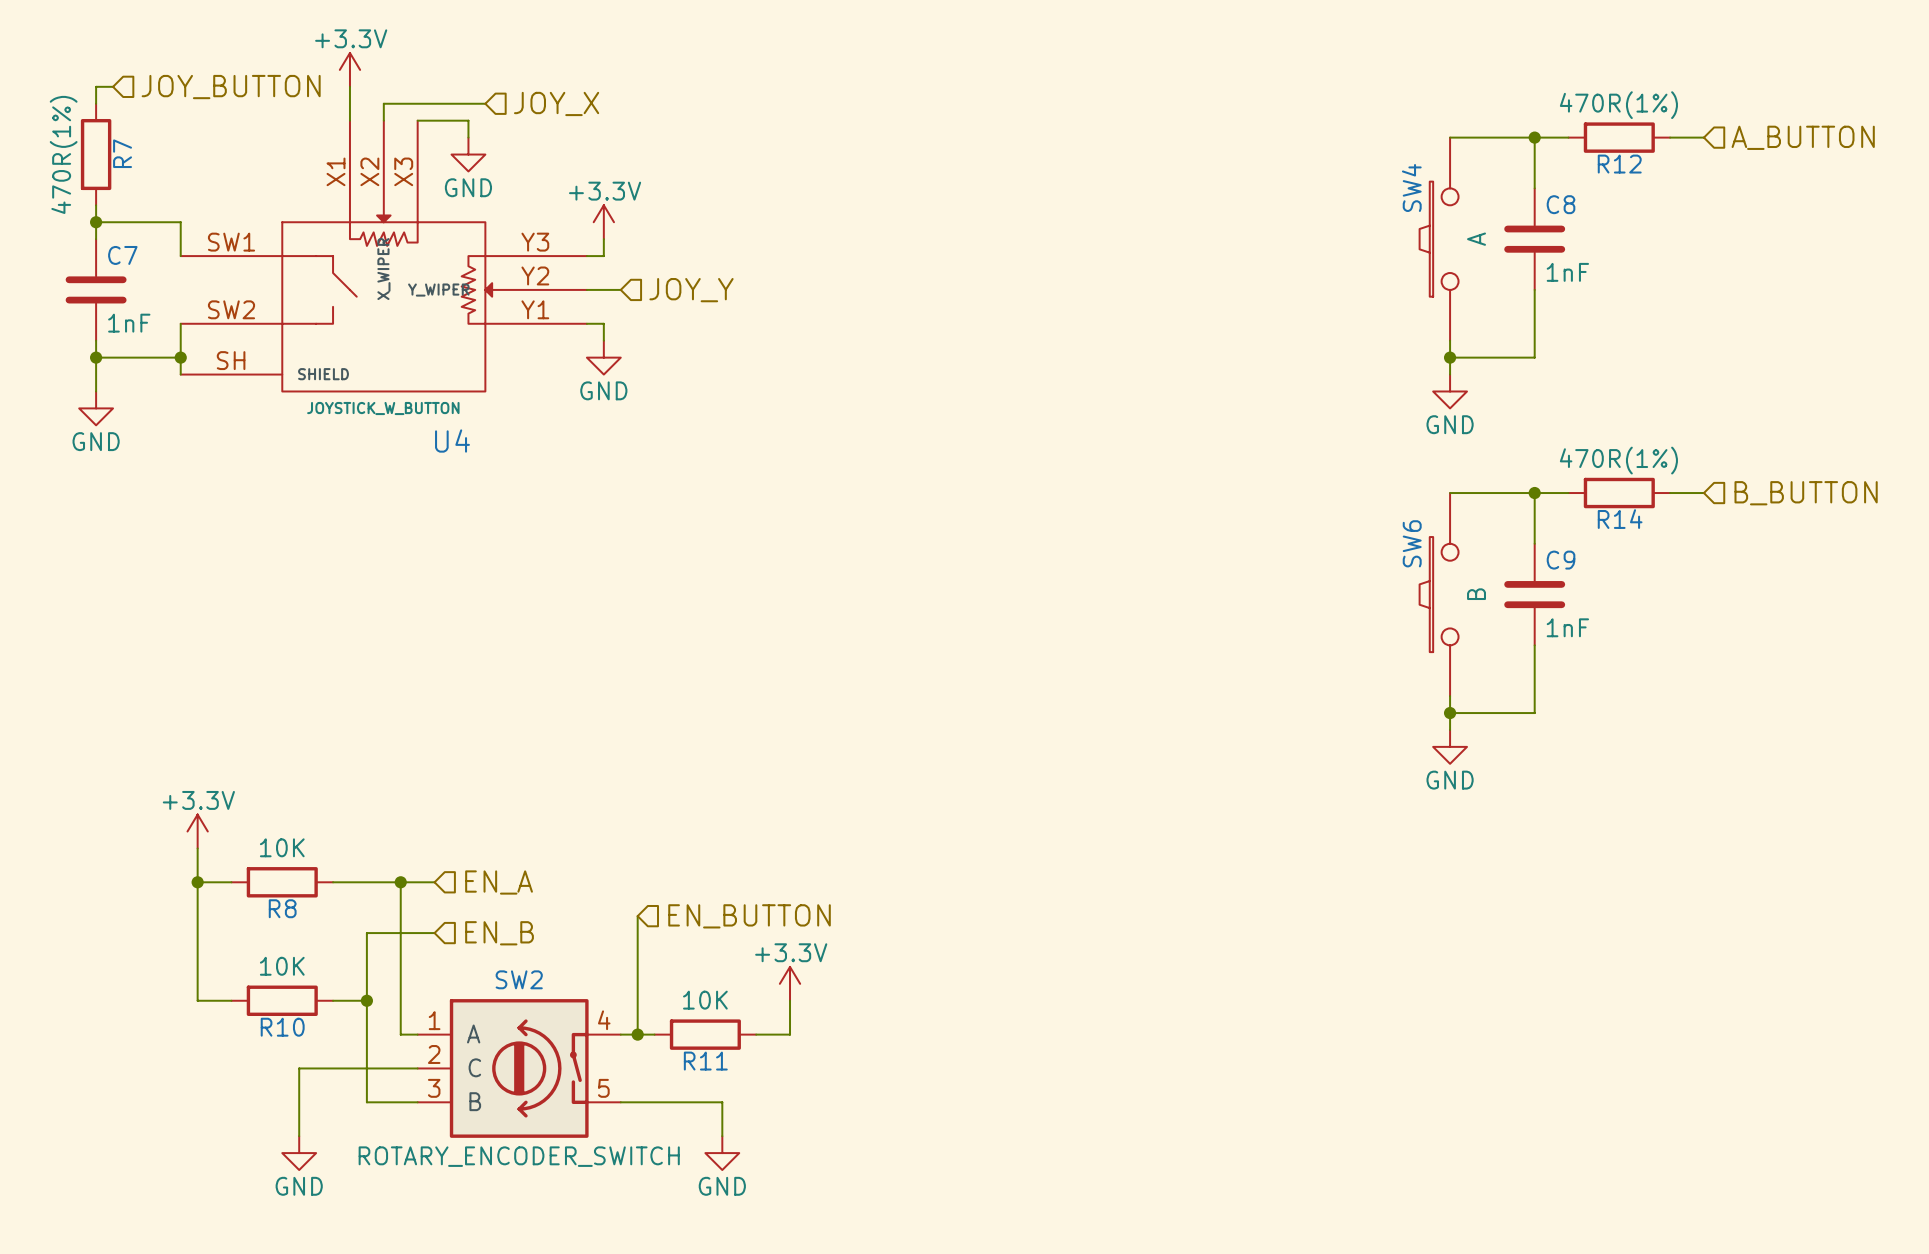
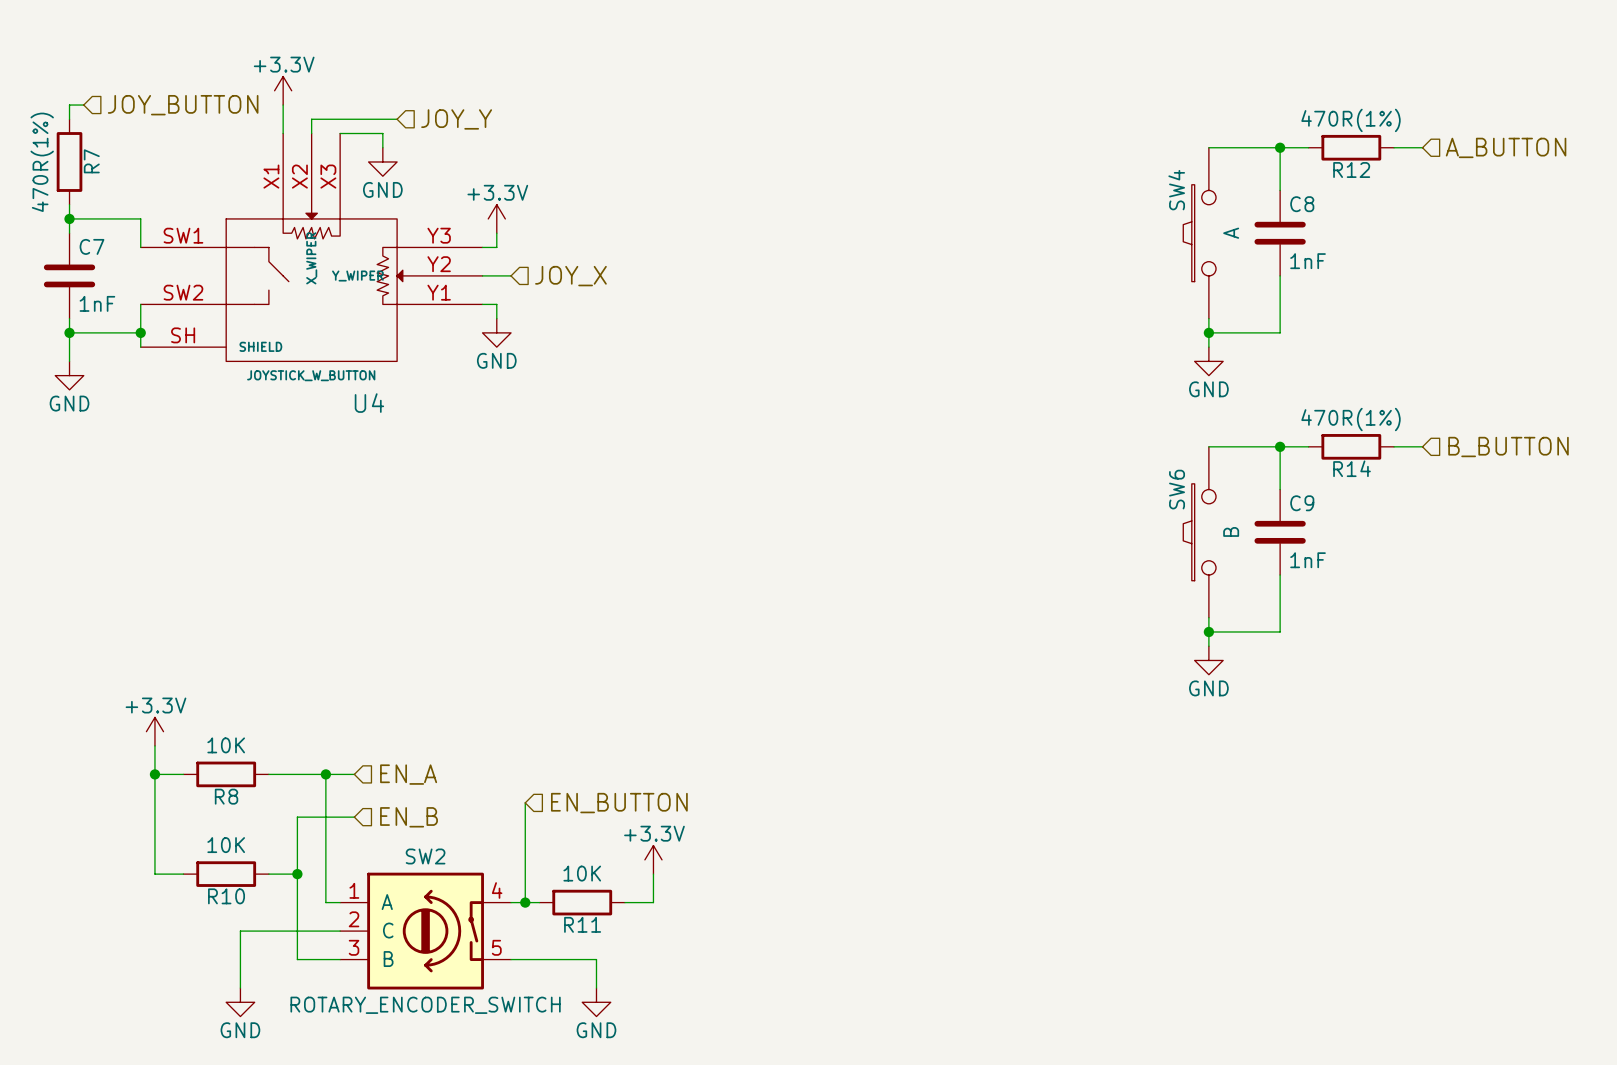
hierarchical label: JOY_X (556, 103) -> JOY_Y (456, 119)
hierarchical label: JOY_Y (691, 290) -> JOY_X (570, 276)

